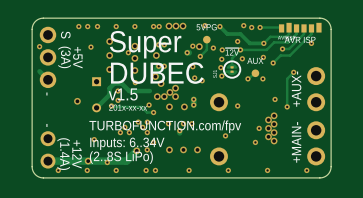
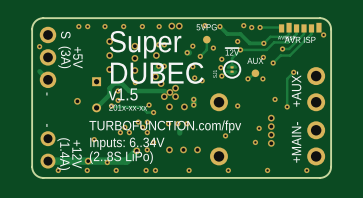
via: (97, 26) -> none
via: none -> (105, 26)
via: (116, 26) -> none
via: none -> (123, 26)
via: (134, 26) -> none
via: none -> (142, 26)
via: (153, 26) -> none
via: (169, 26) -> none
via: none -> (171, 26)
via: (176, 26) -> none
via: none -> (179, 26)
via: (183, 26) -> none
via position: (311, 43) -> (323, 34)
via: (199, 46) -> none
via: (90, 47) -> none
via: (222, 49) -> none
via: (128, 52) -> none
via: (242, 58) -> none
track: none -> (164, 91) (149, 91)
via: (157, 96) -> none
via: (274, 115) -> none
via: none -> (271, 118)
via: (268, 120) -> none
via: none -> (177, 123)
via: (183, 123) -> none
via: none -> (187, 123)
via: (191, 123) -> none
via: (274, 124) -> none
via: none -> (271, 126)
via: (268, 128) -> none
via: (179, 130) -> none
via: (274, 132) -> none
via: none -> (271, 134)
via: (268, 136) -> none
via: (274, 141) -> none
via: none -> (271, 143)

